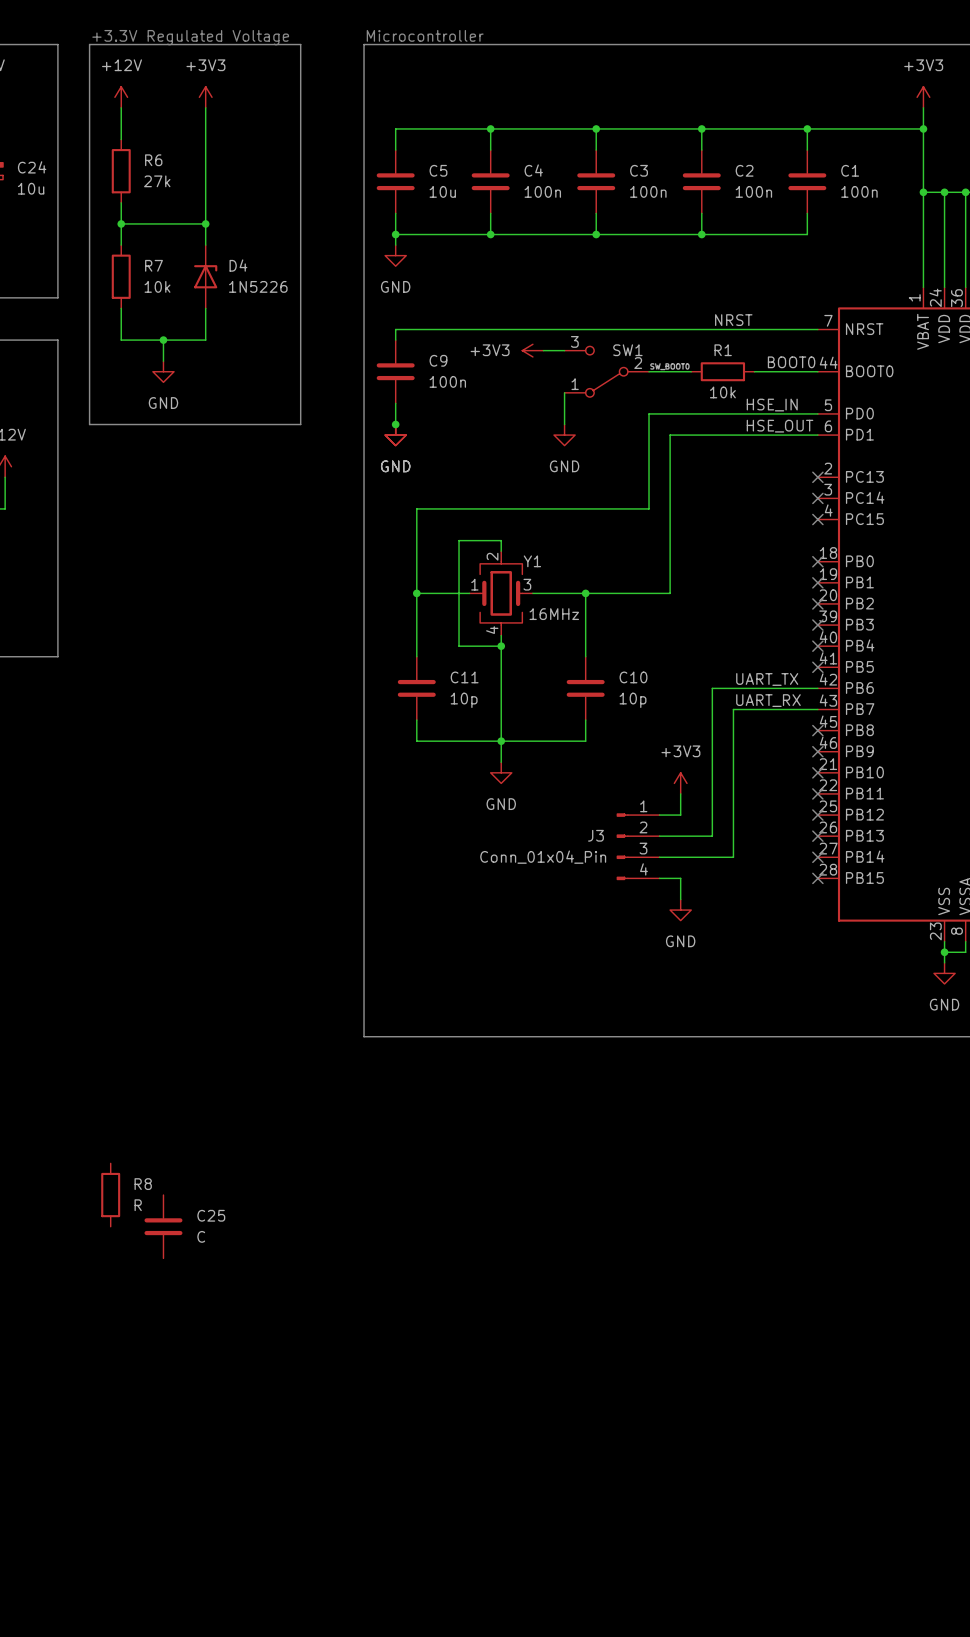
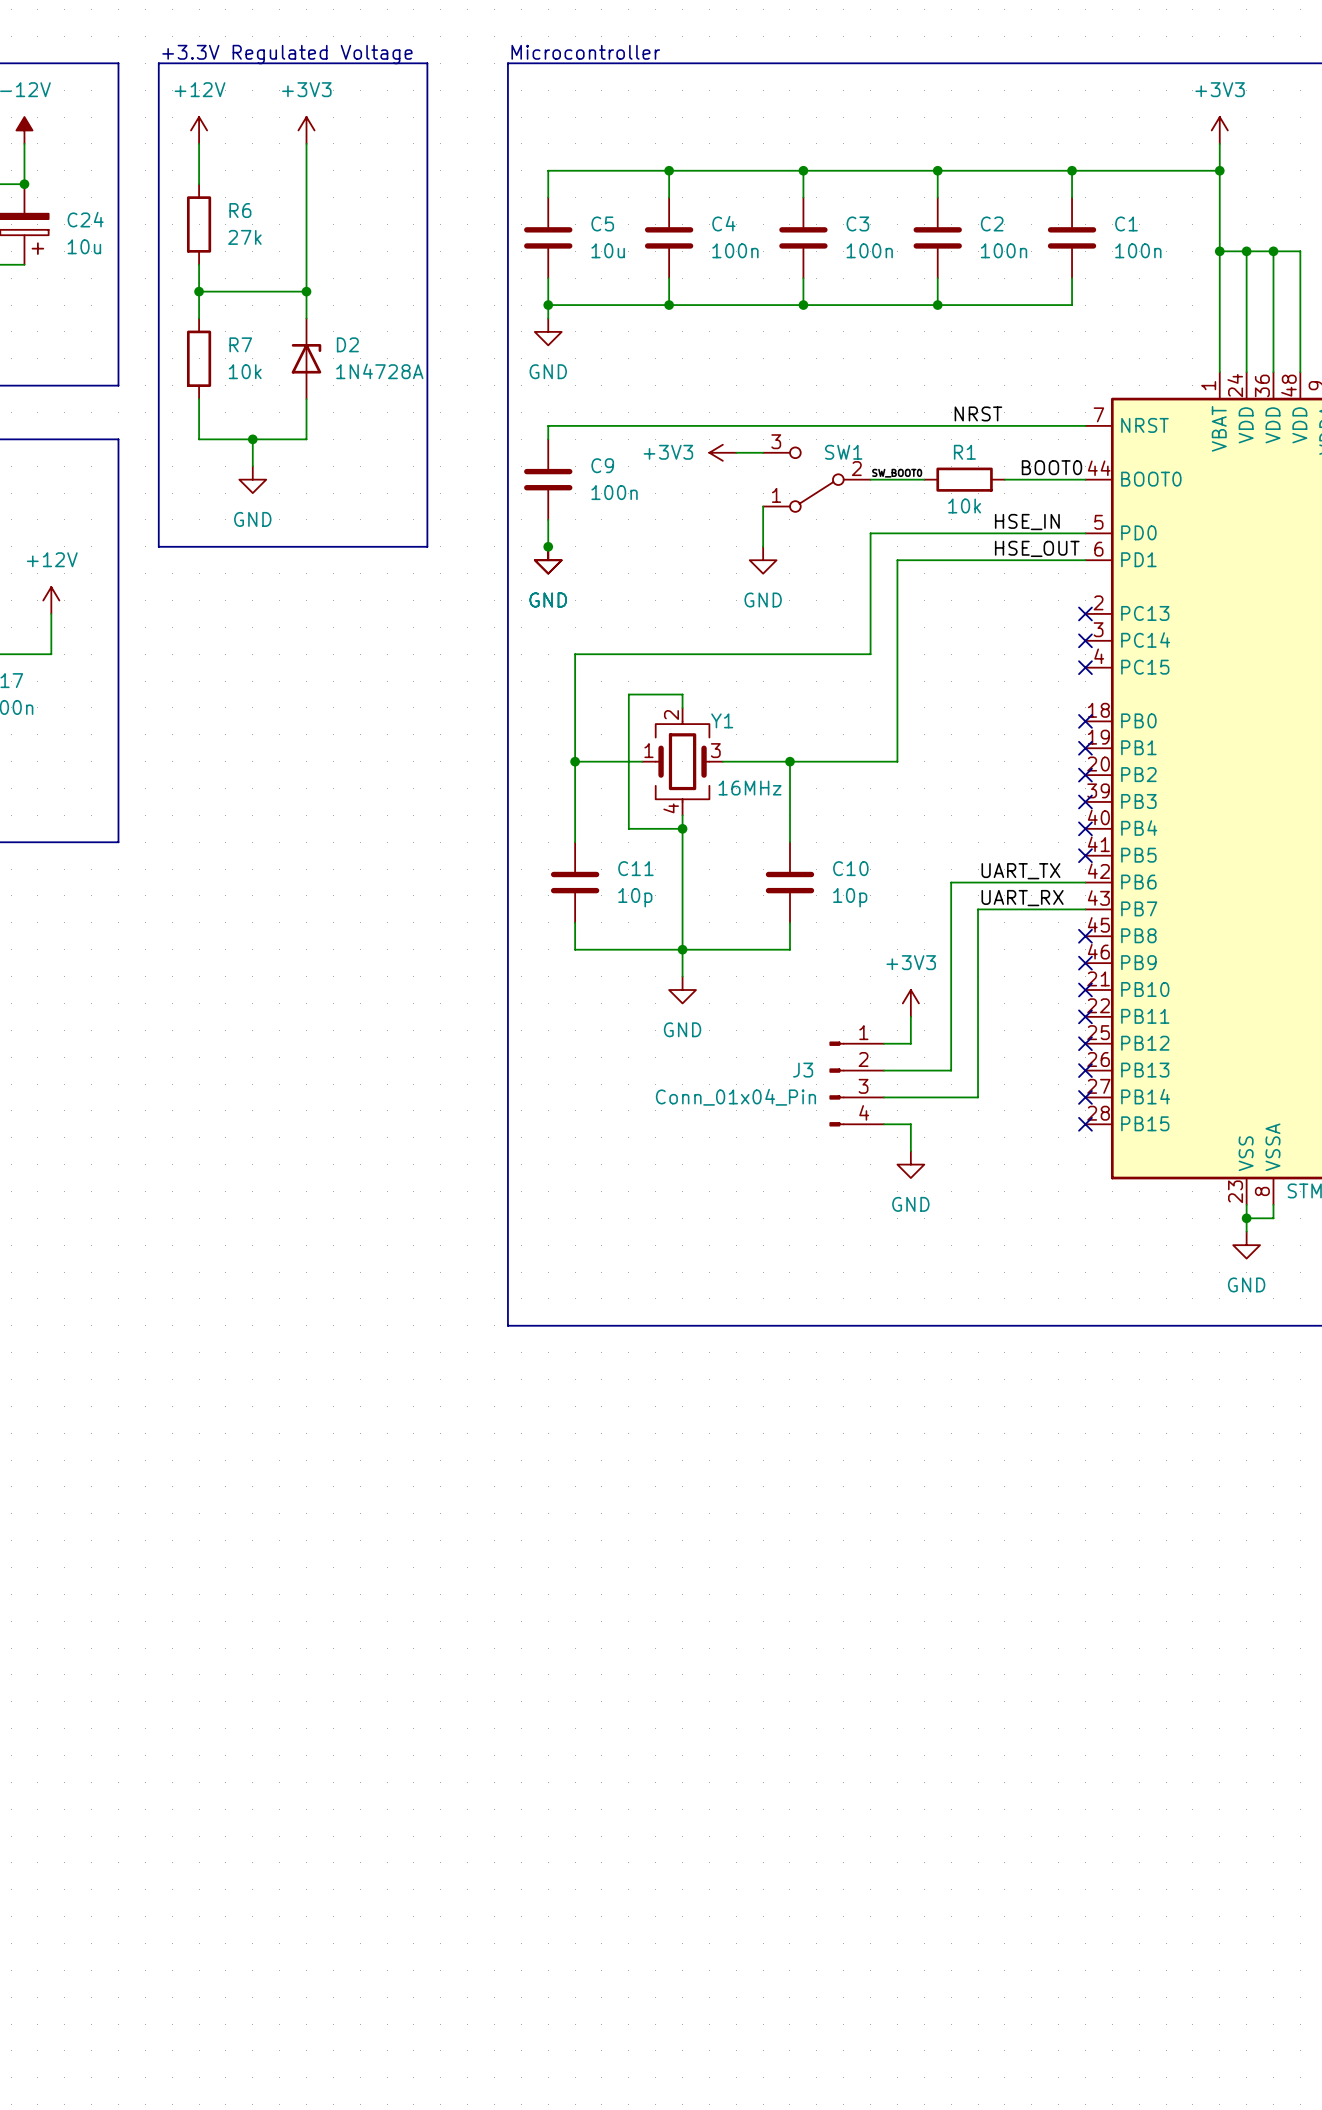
D4 name: D4 (238, 265) -> D2 (347, 344)
D4 value: 1N5226 (258, 286) -> 1N4728A (379, 371)
R8: R (110, 1195) -> none
C25: C (163, 1226) -> none

